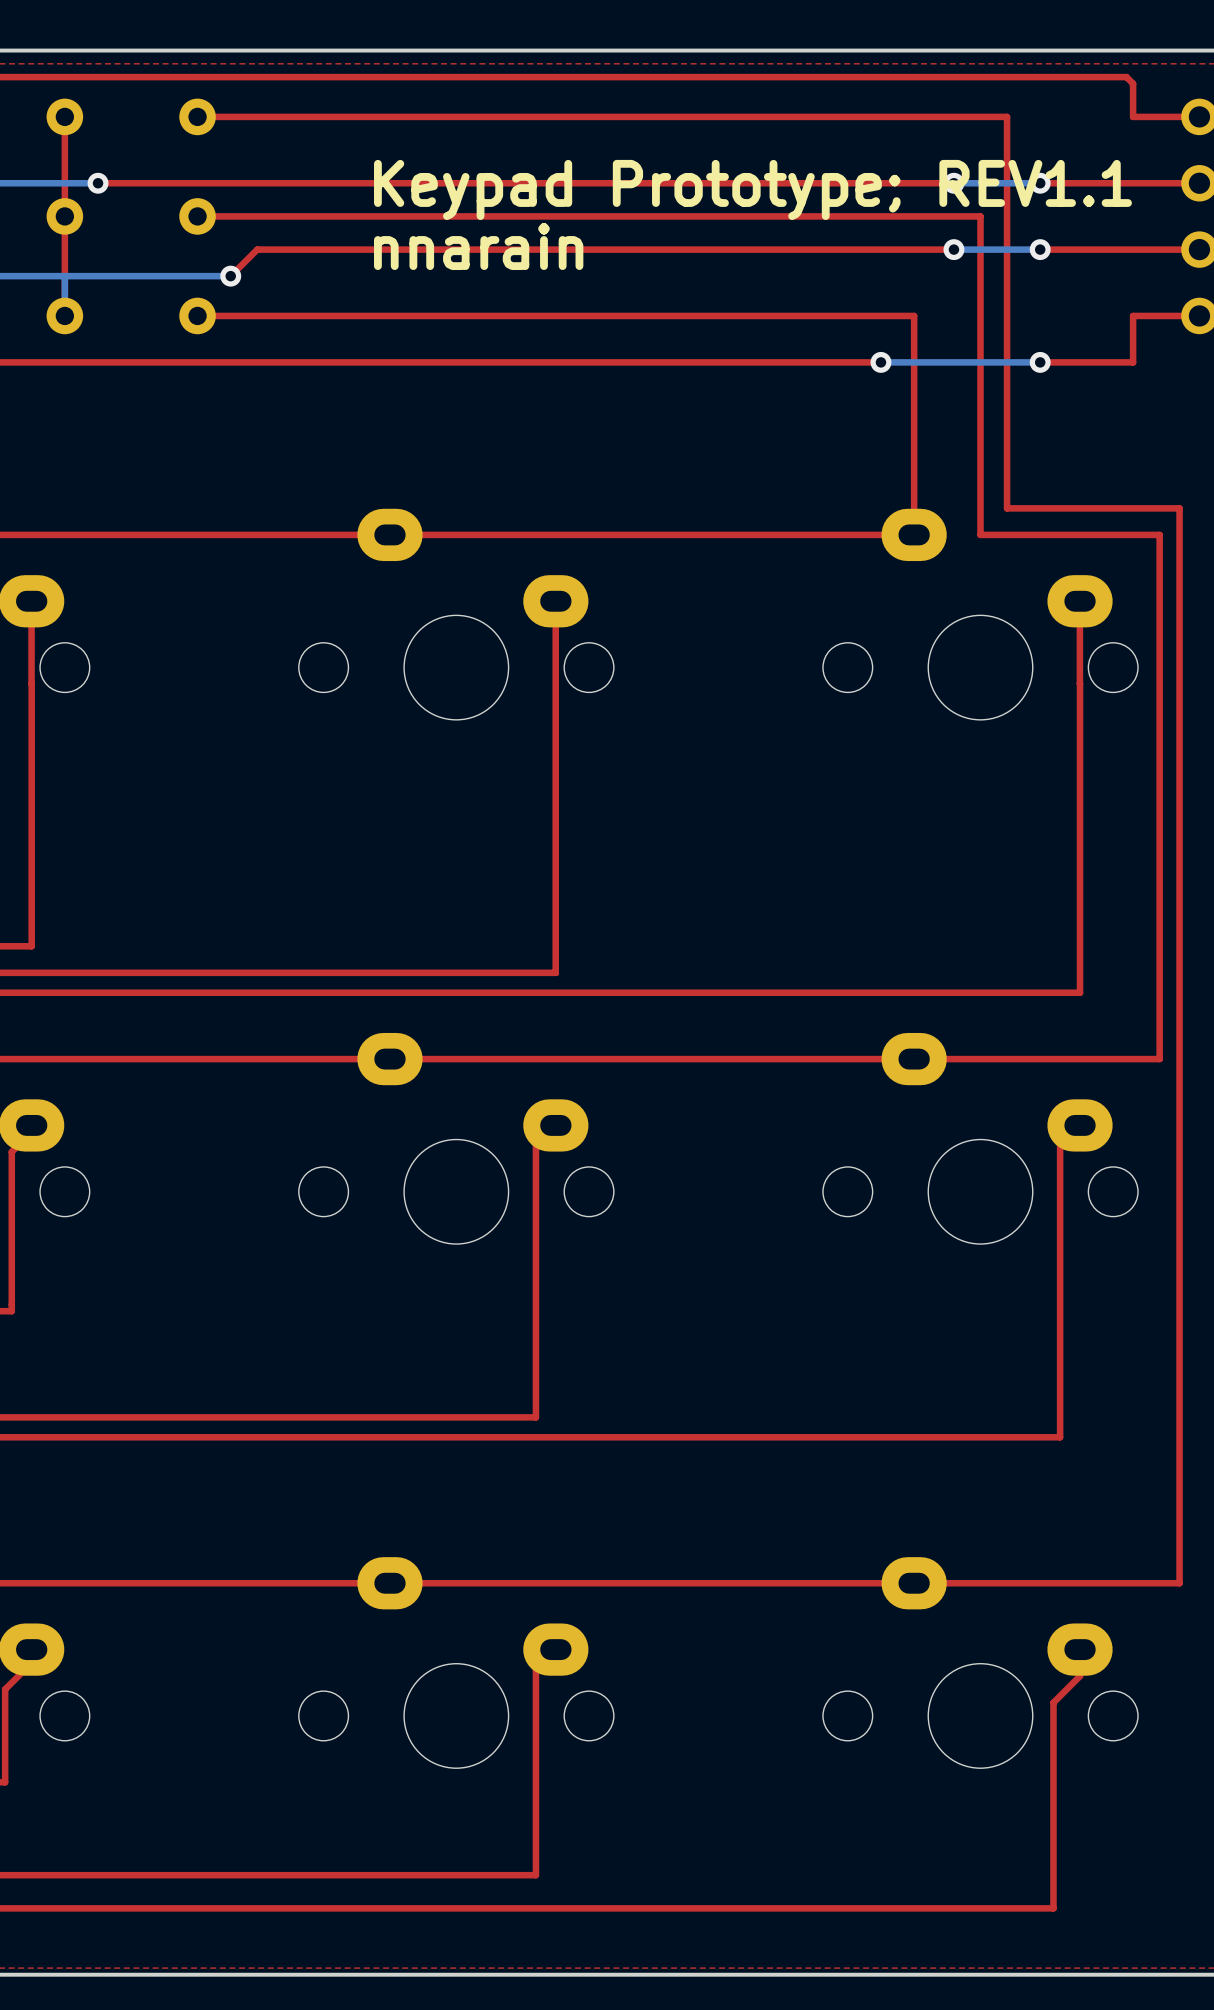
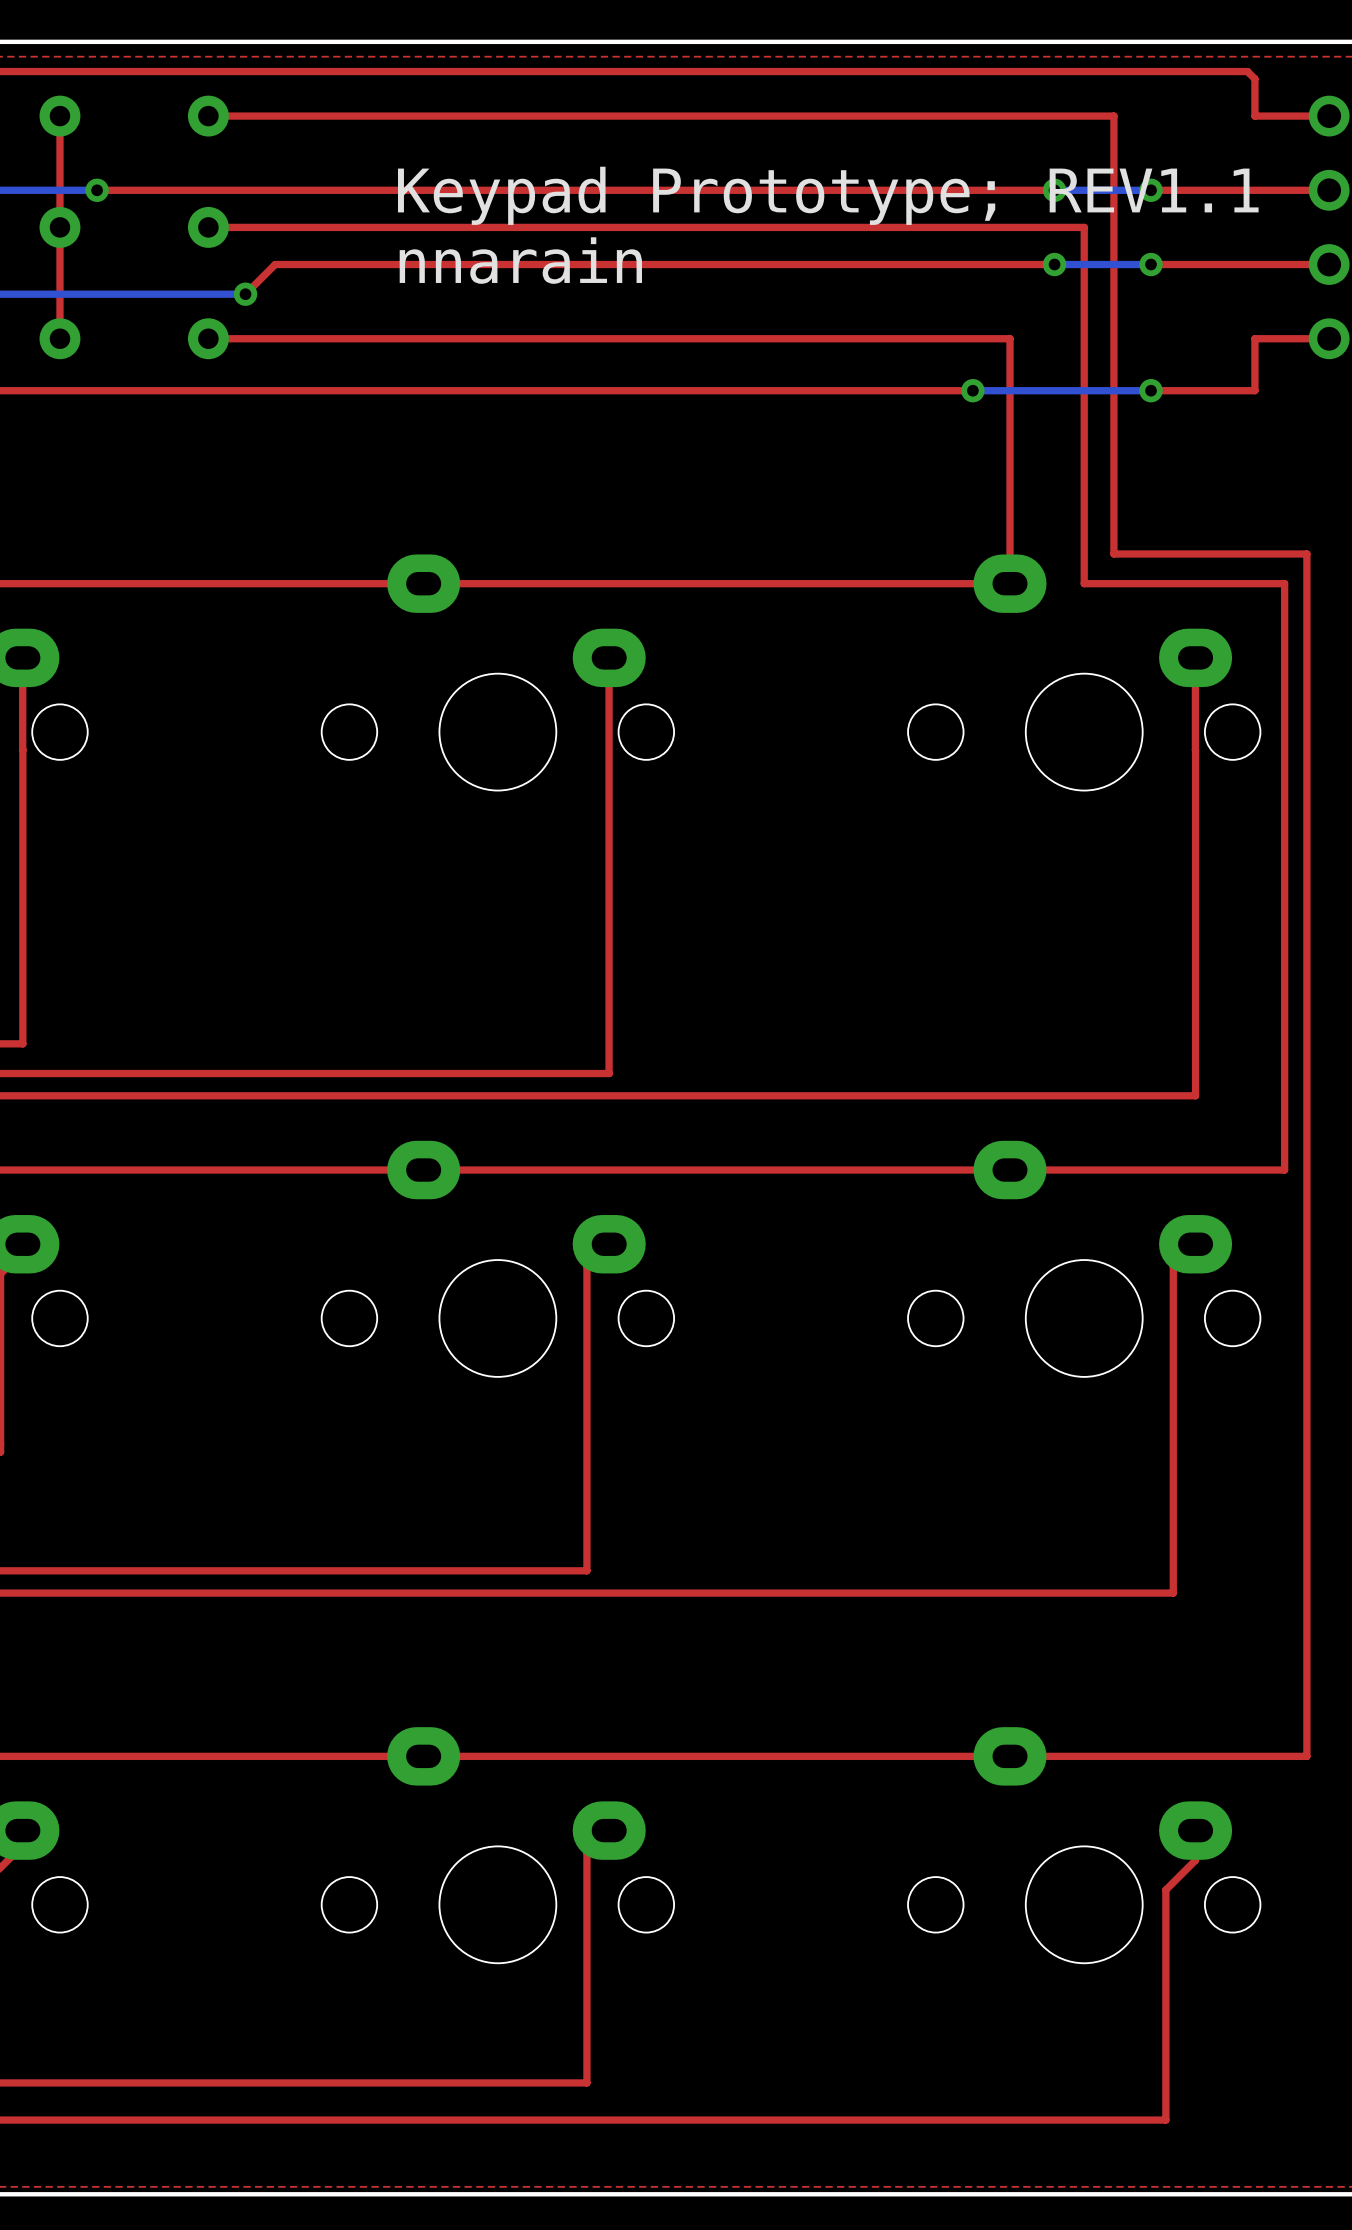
bottom track: (64, 276) (64, 315) -> none

